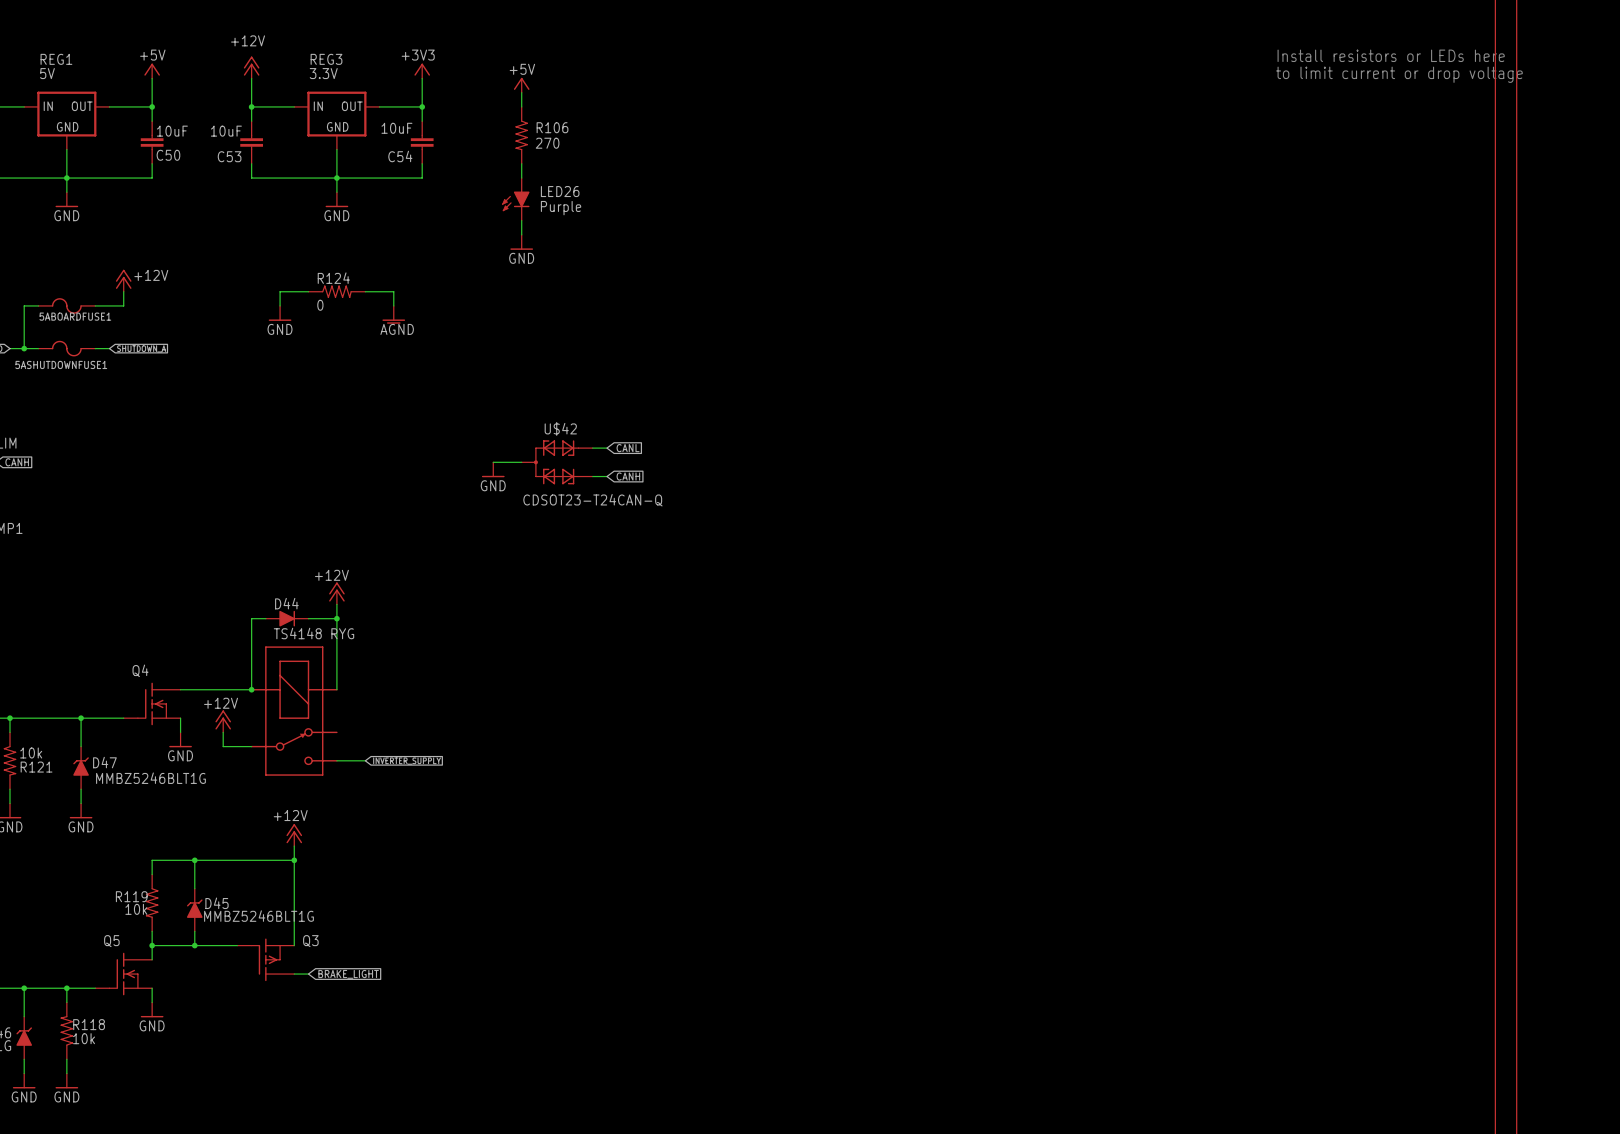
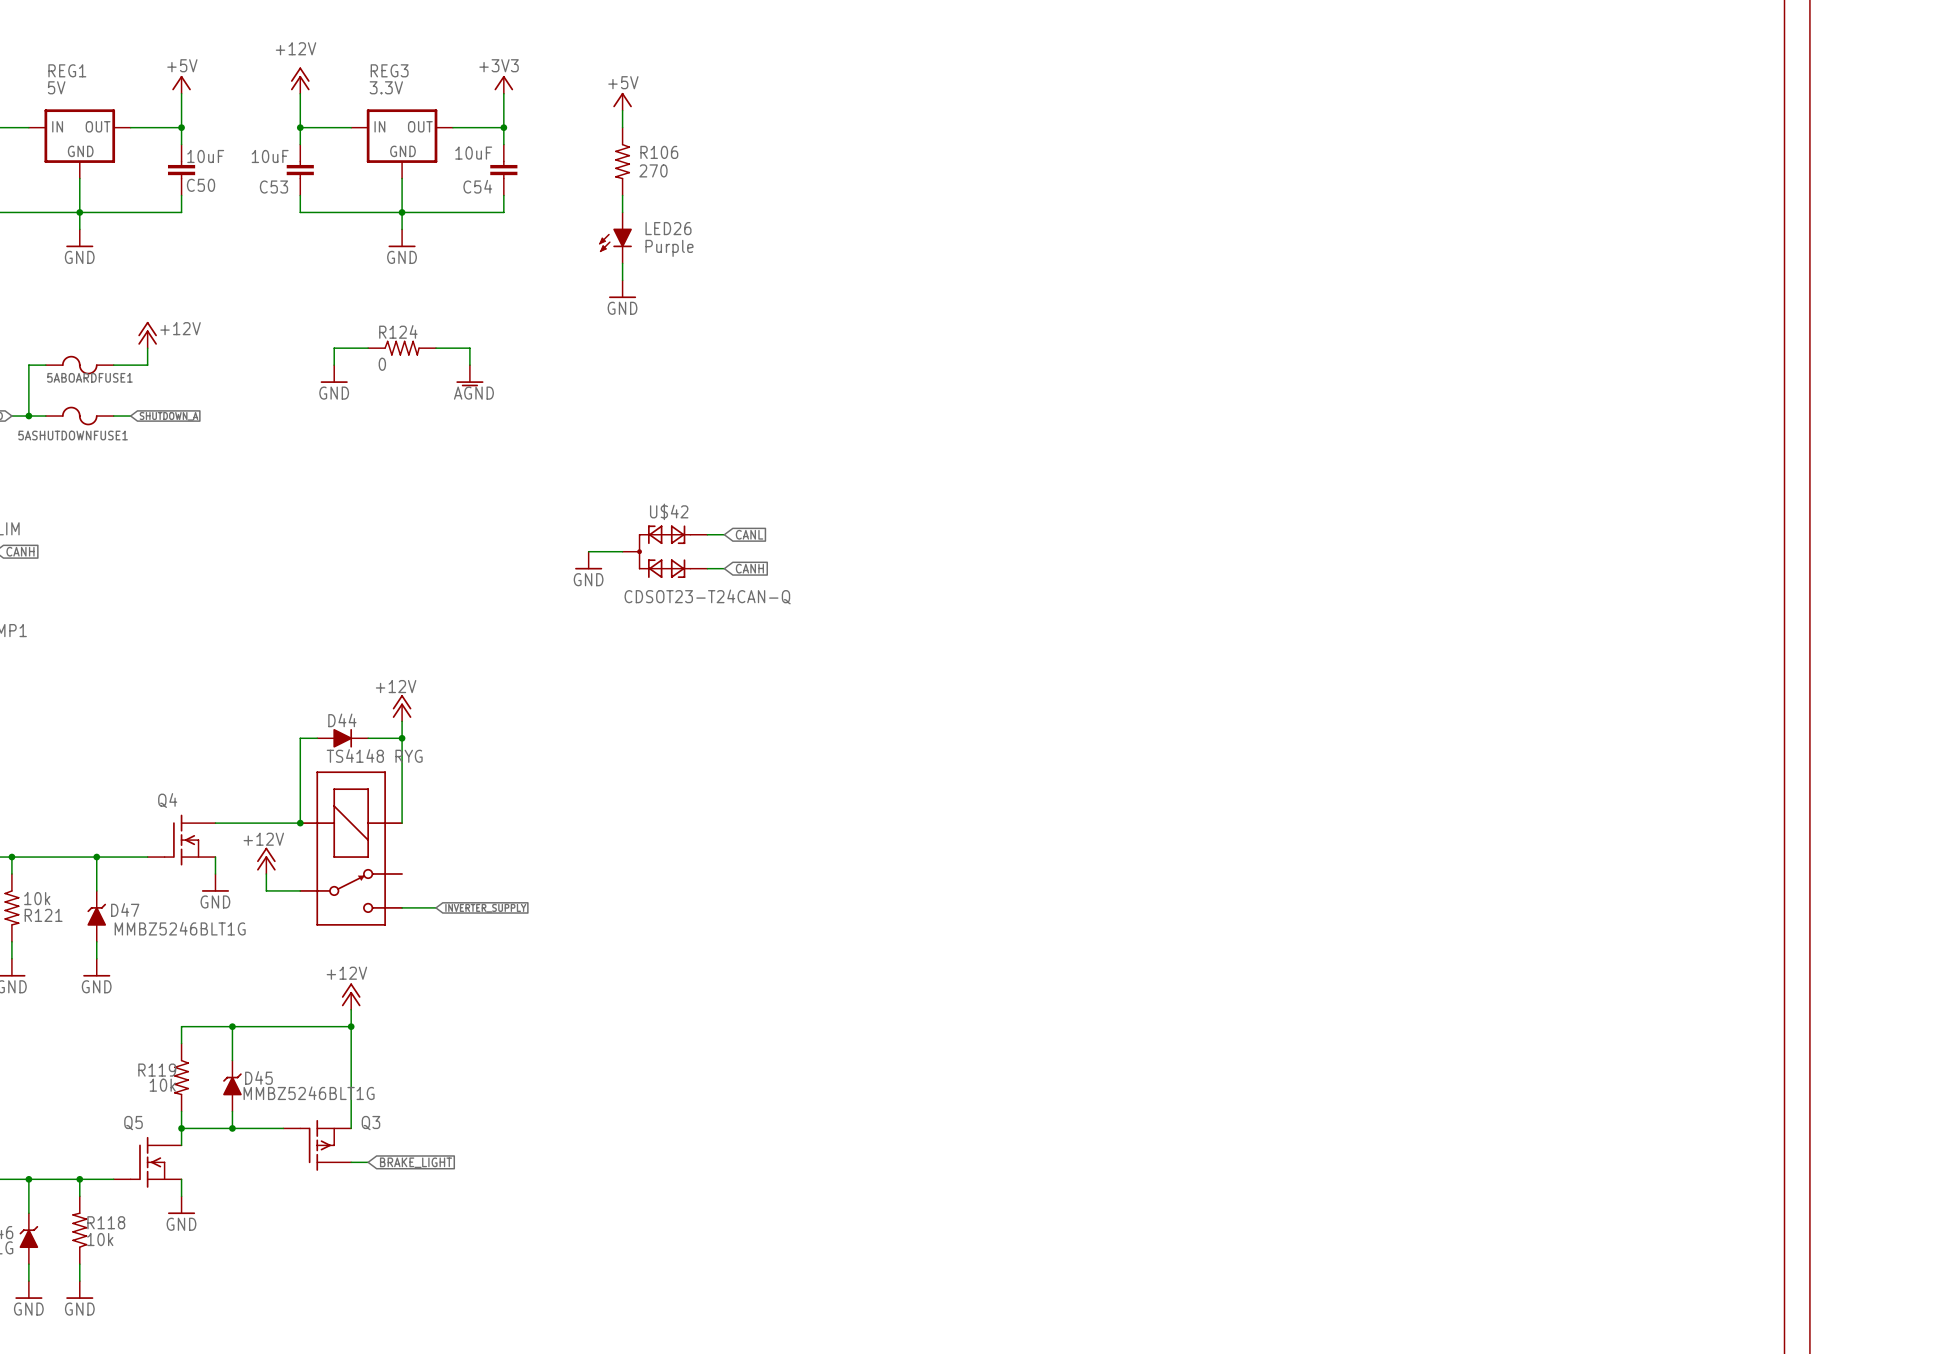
text: Install resistors or LEDs here (1391, 55) -> none
text: to limit current or drop voltage (1399, 74) -> none

